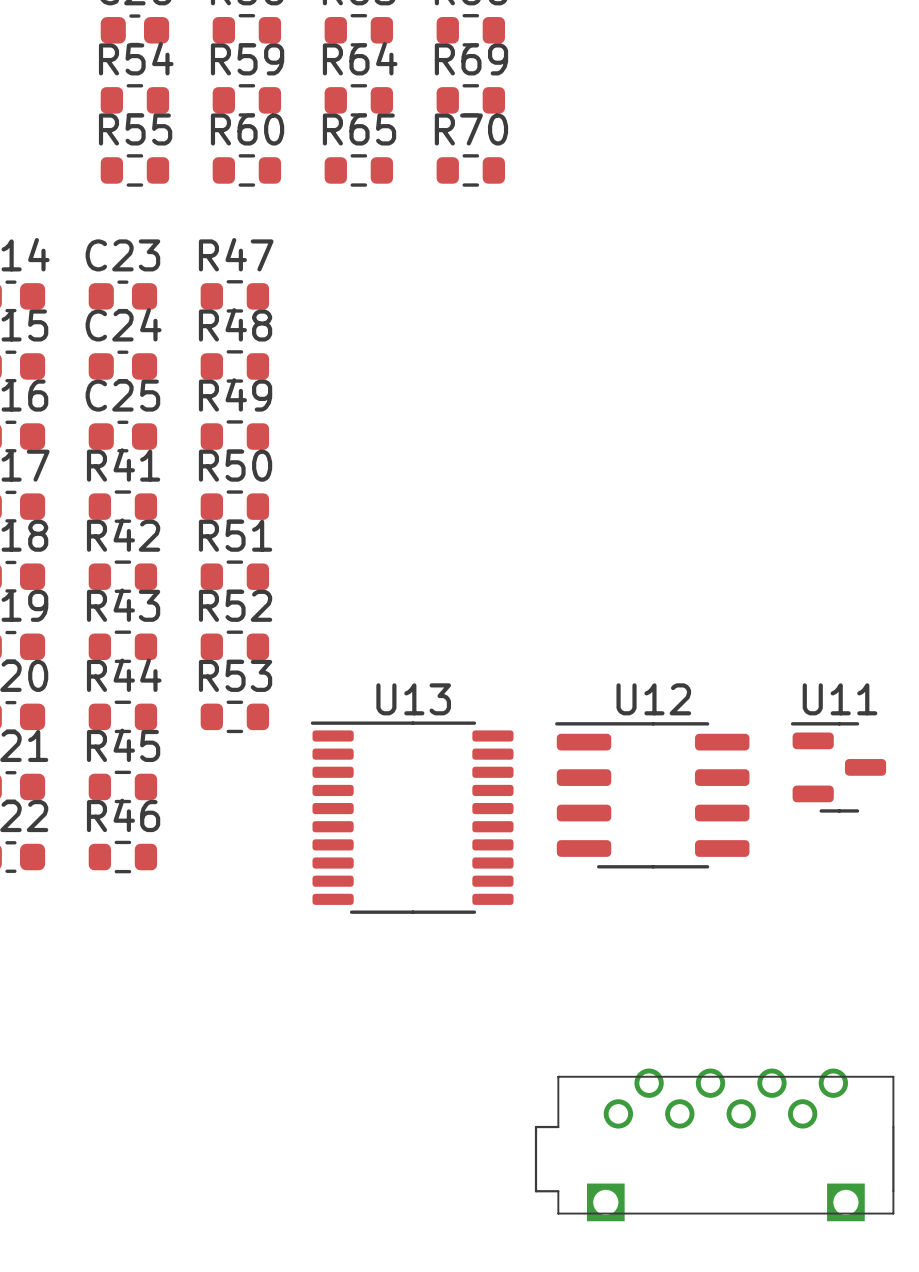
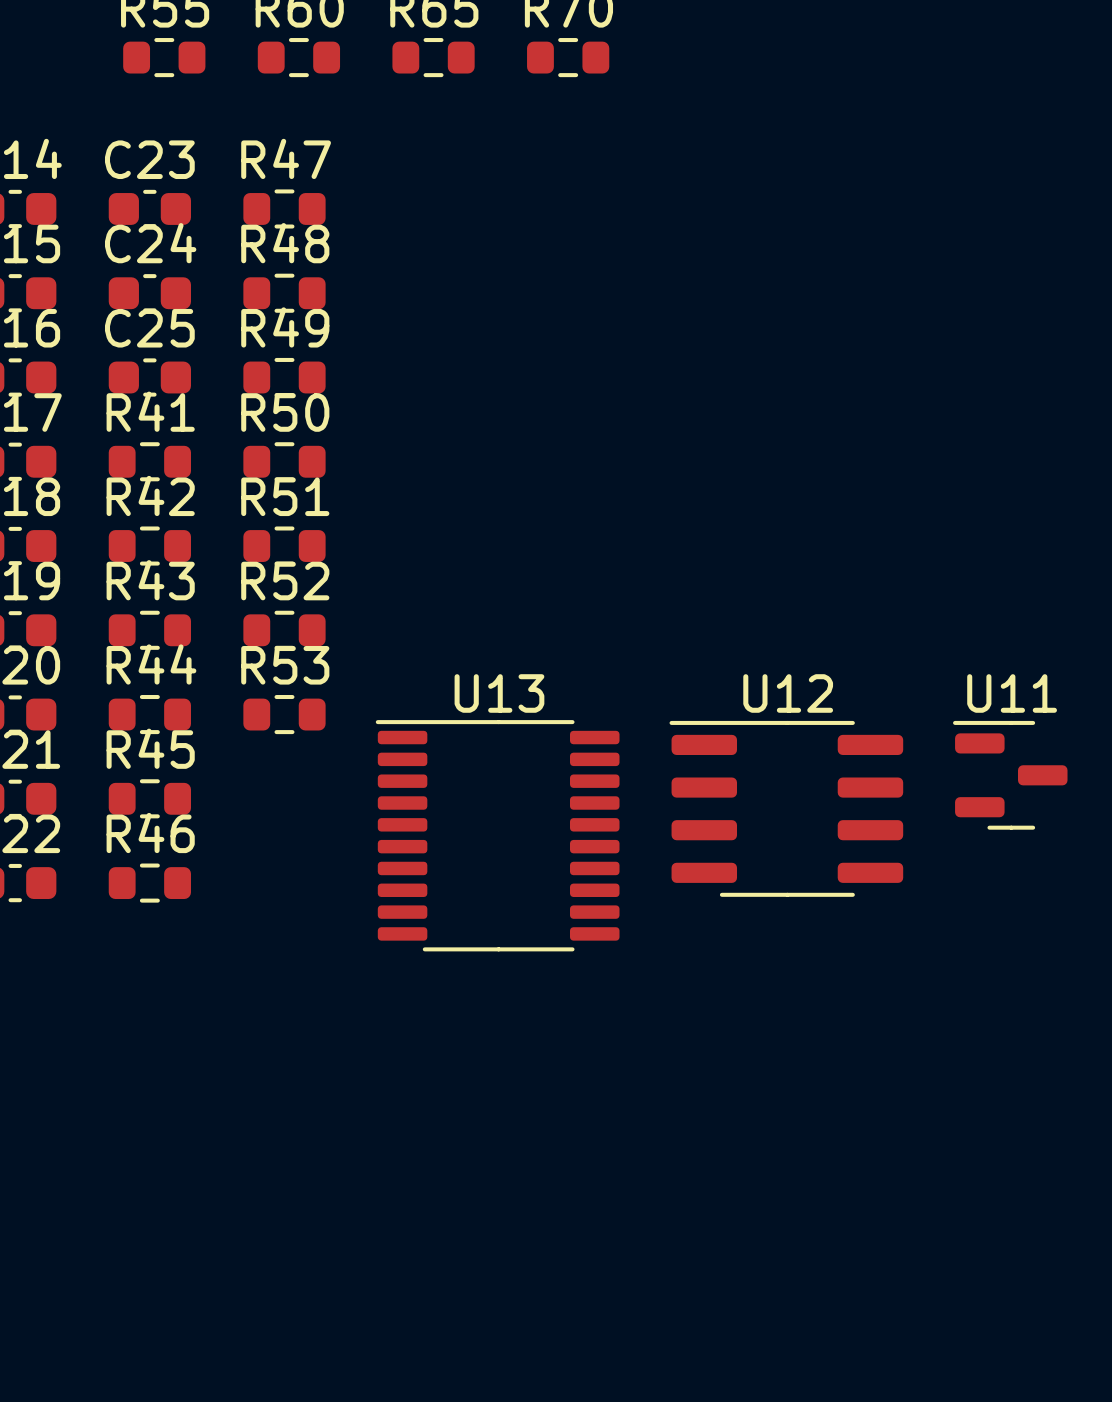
part: (714, 1144) -> none

